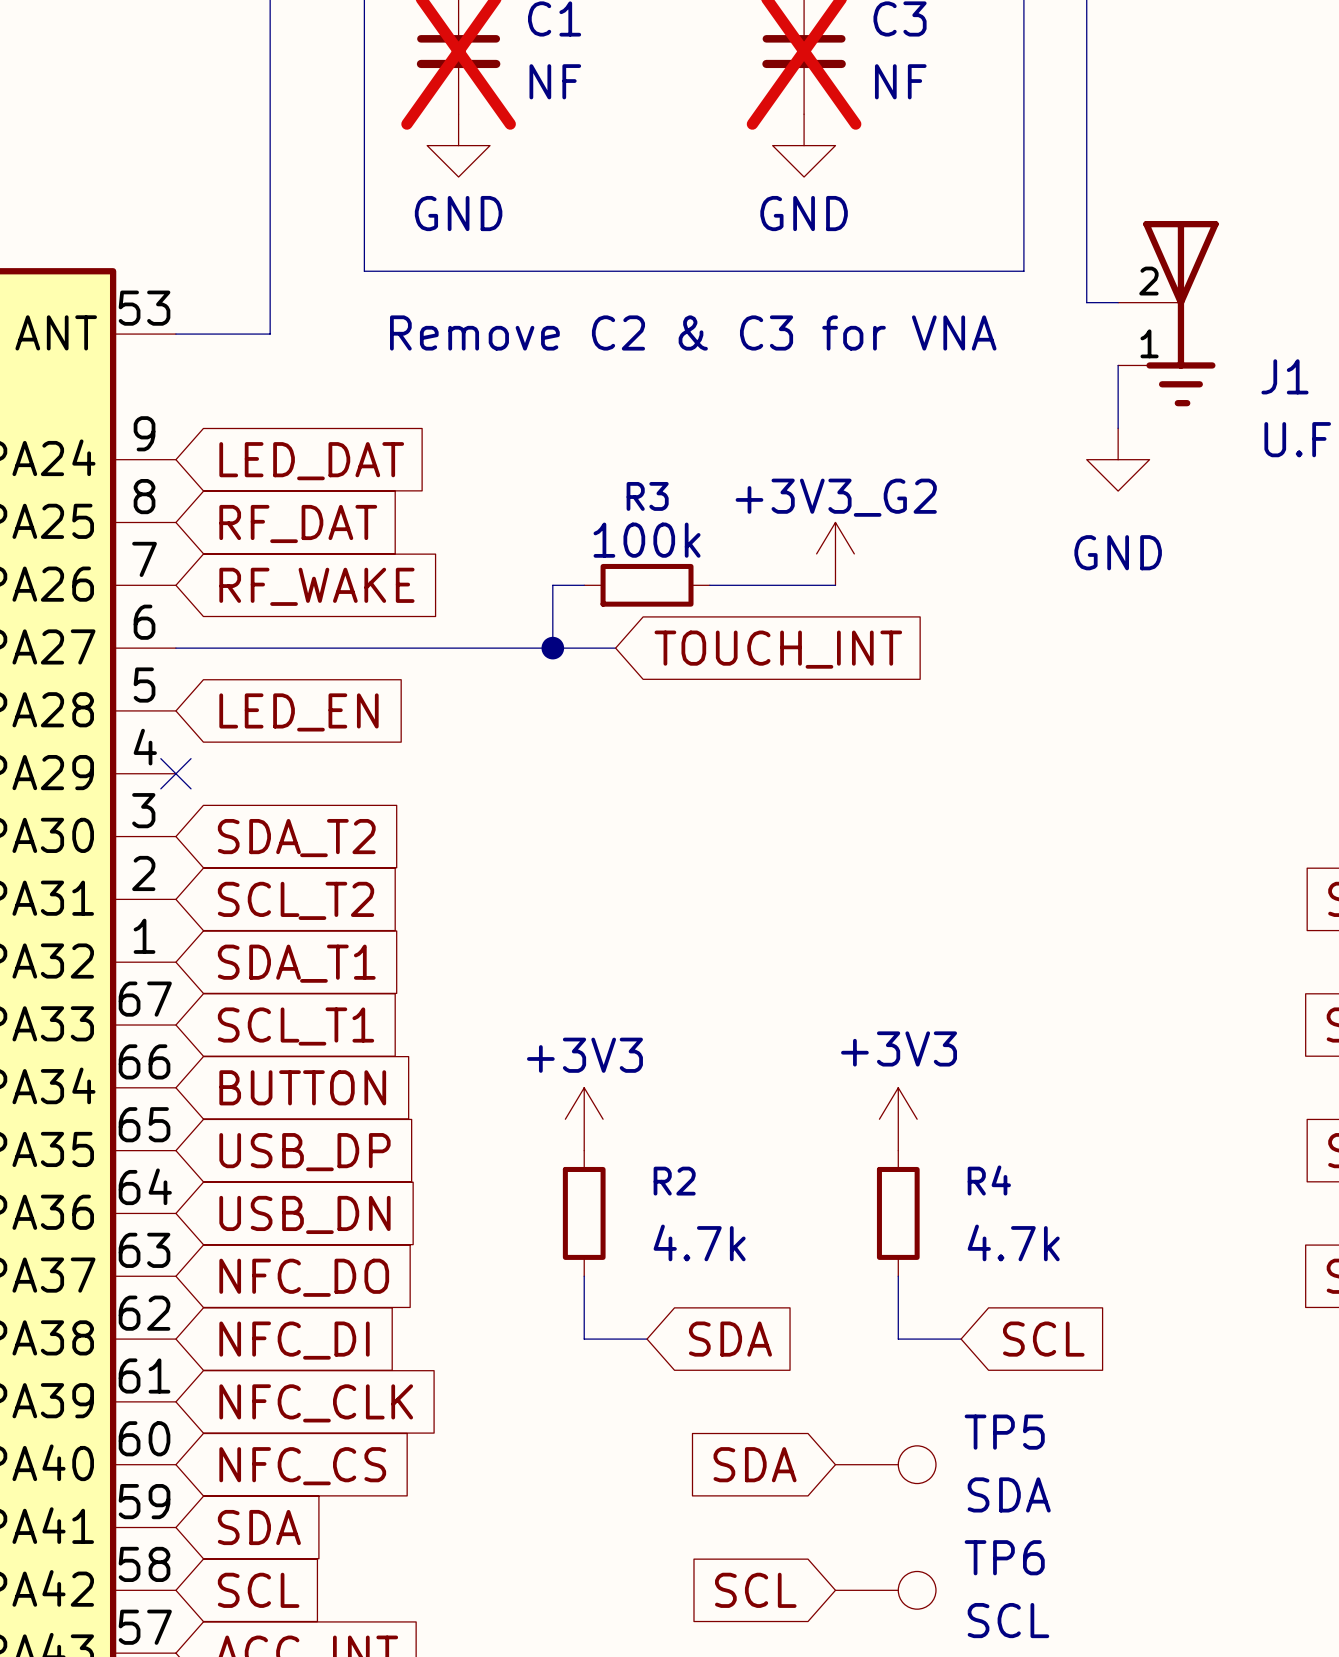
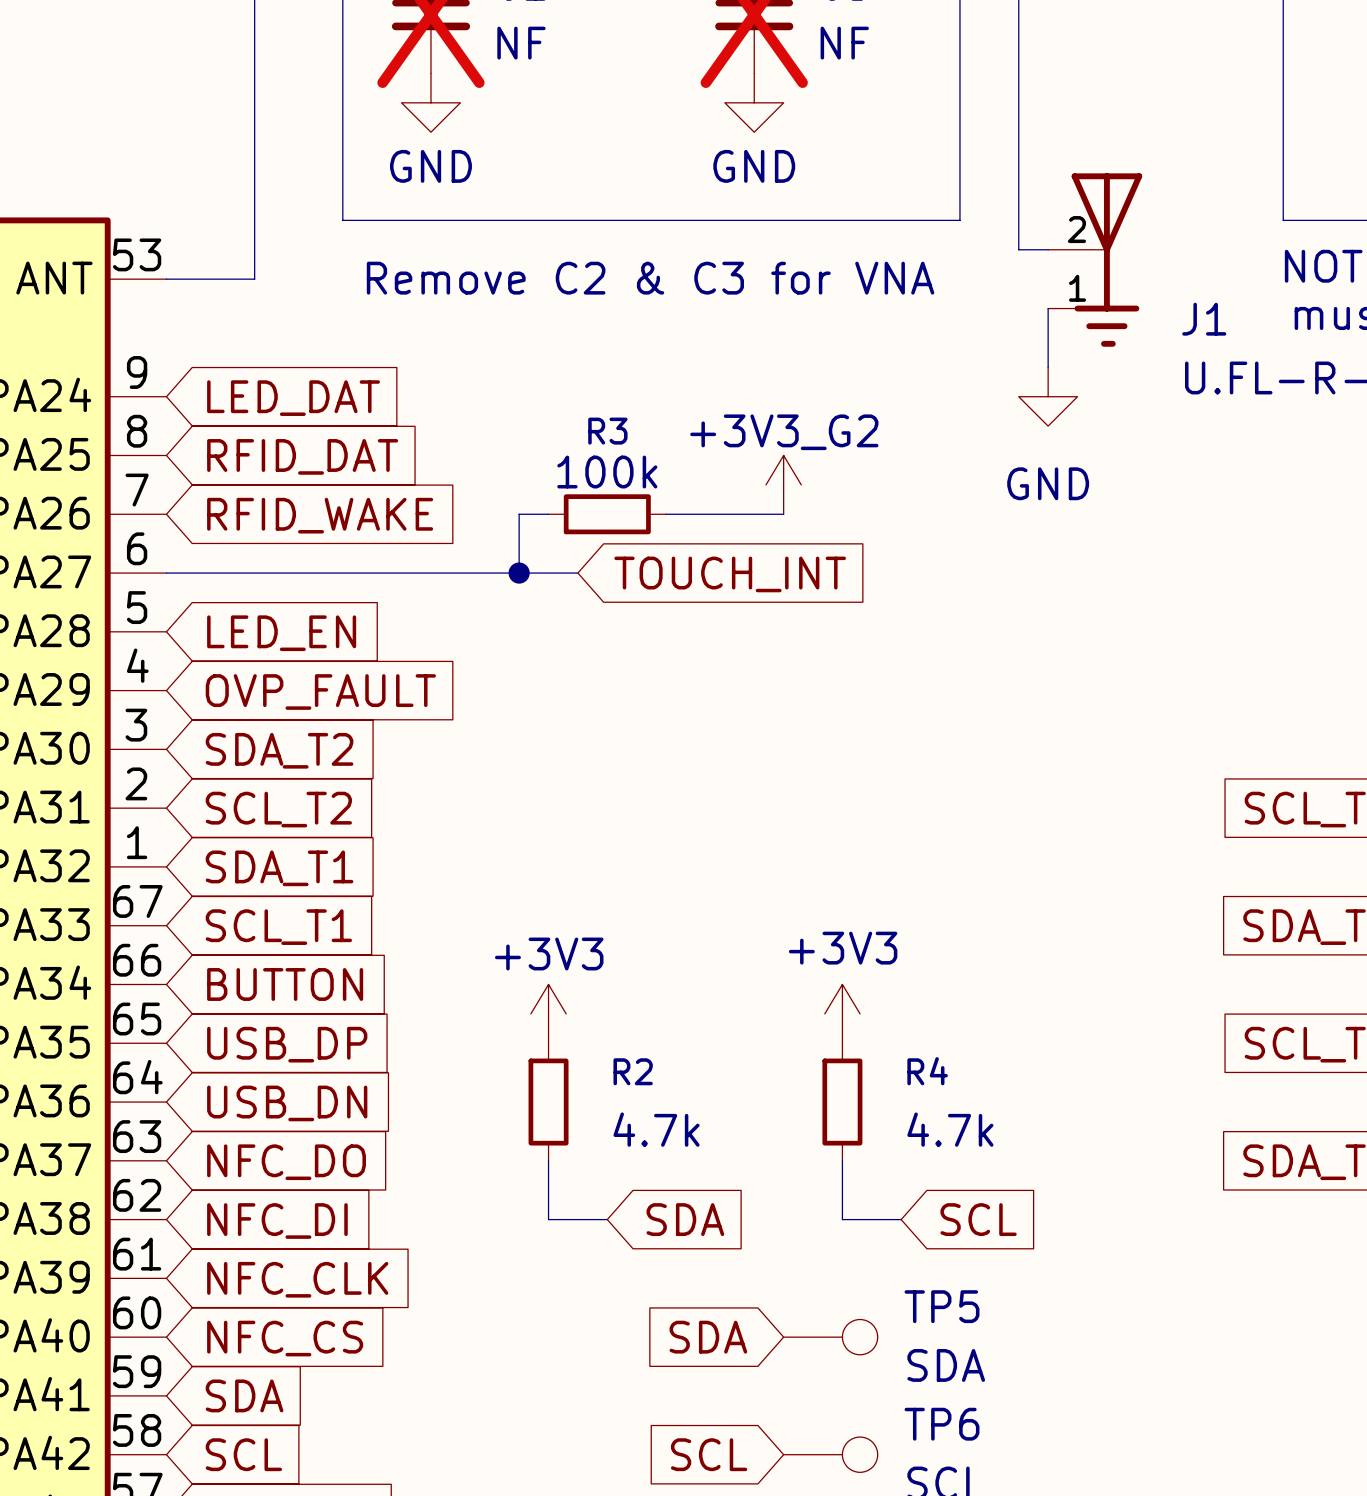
global label: RF_DAT (298, 523) -> RFID_DAT (302, 456)
global label: RF_WAKE (316, 586) -> RFID_WAKE (320, 515)
no-connect mark: (175, 773) -> none
global label: none -> OVP_FAULT (320, 692)

